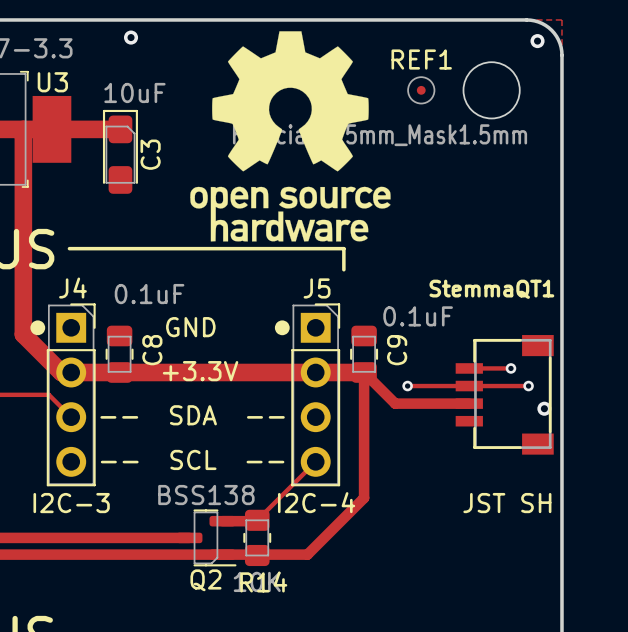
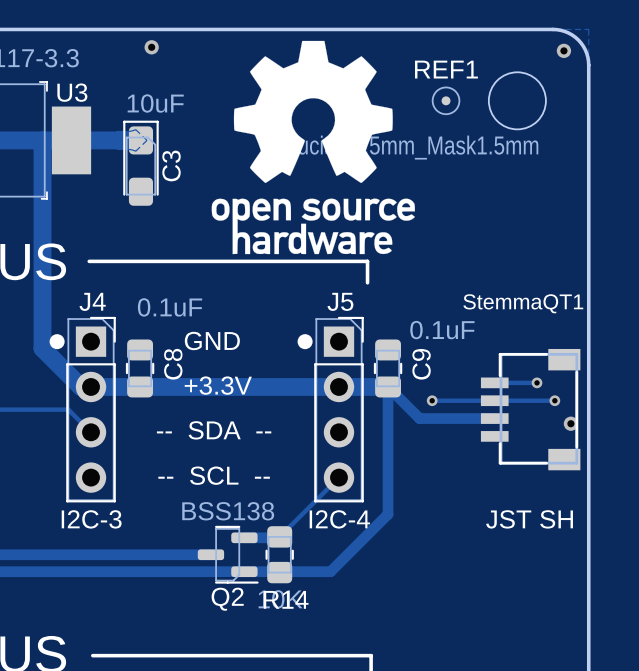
zone outline: none -> (135, 129) (146, 140) (135, 151) (116, 149) (116, 131) (135, 129)

